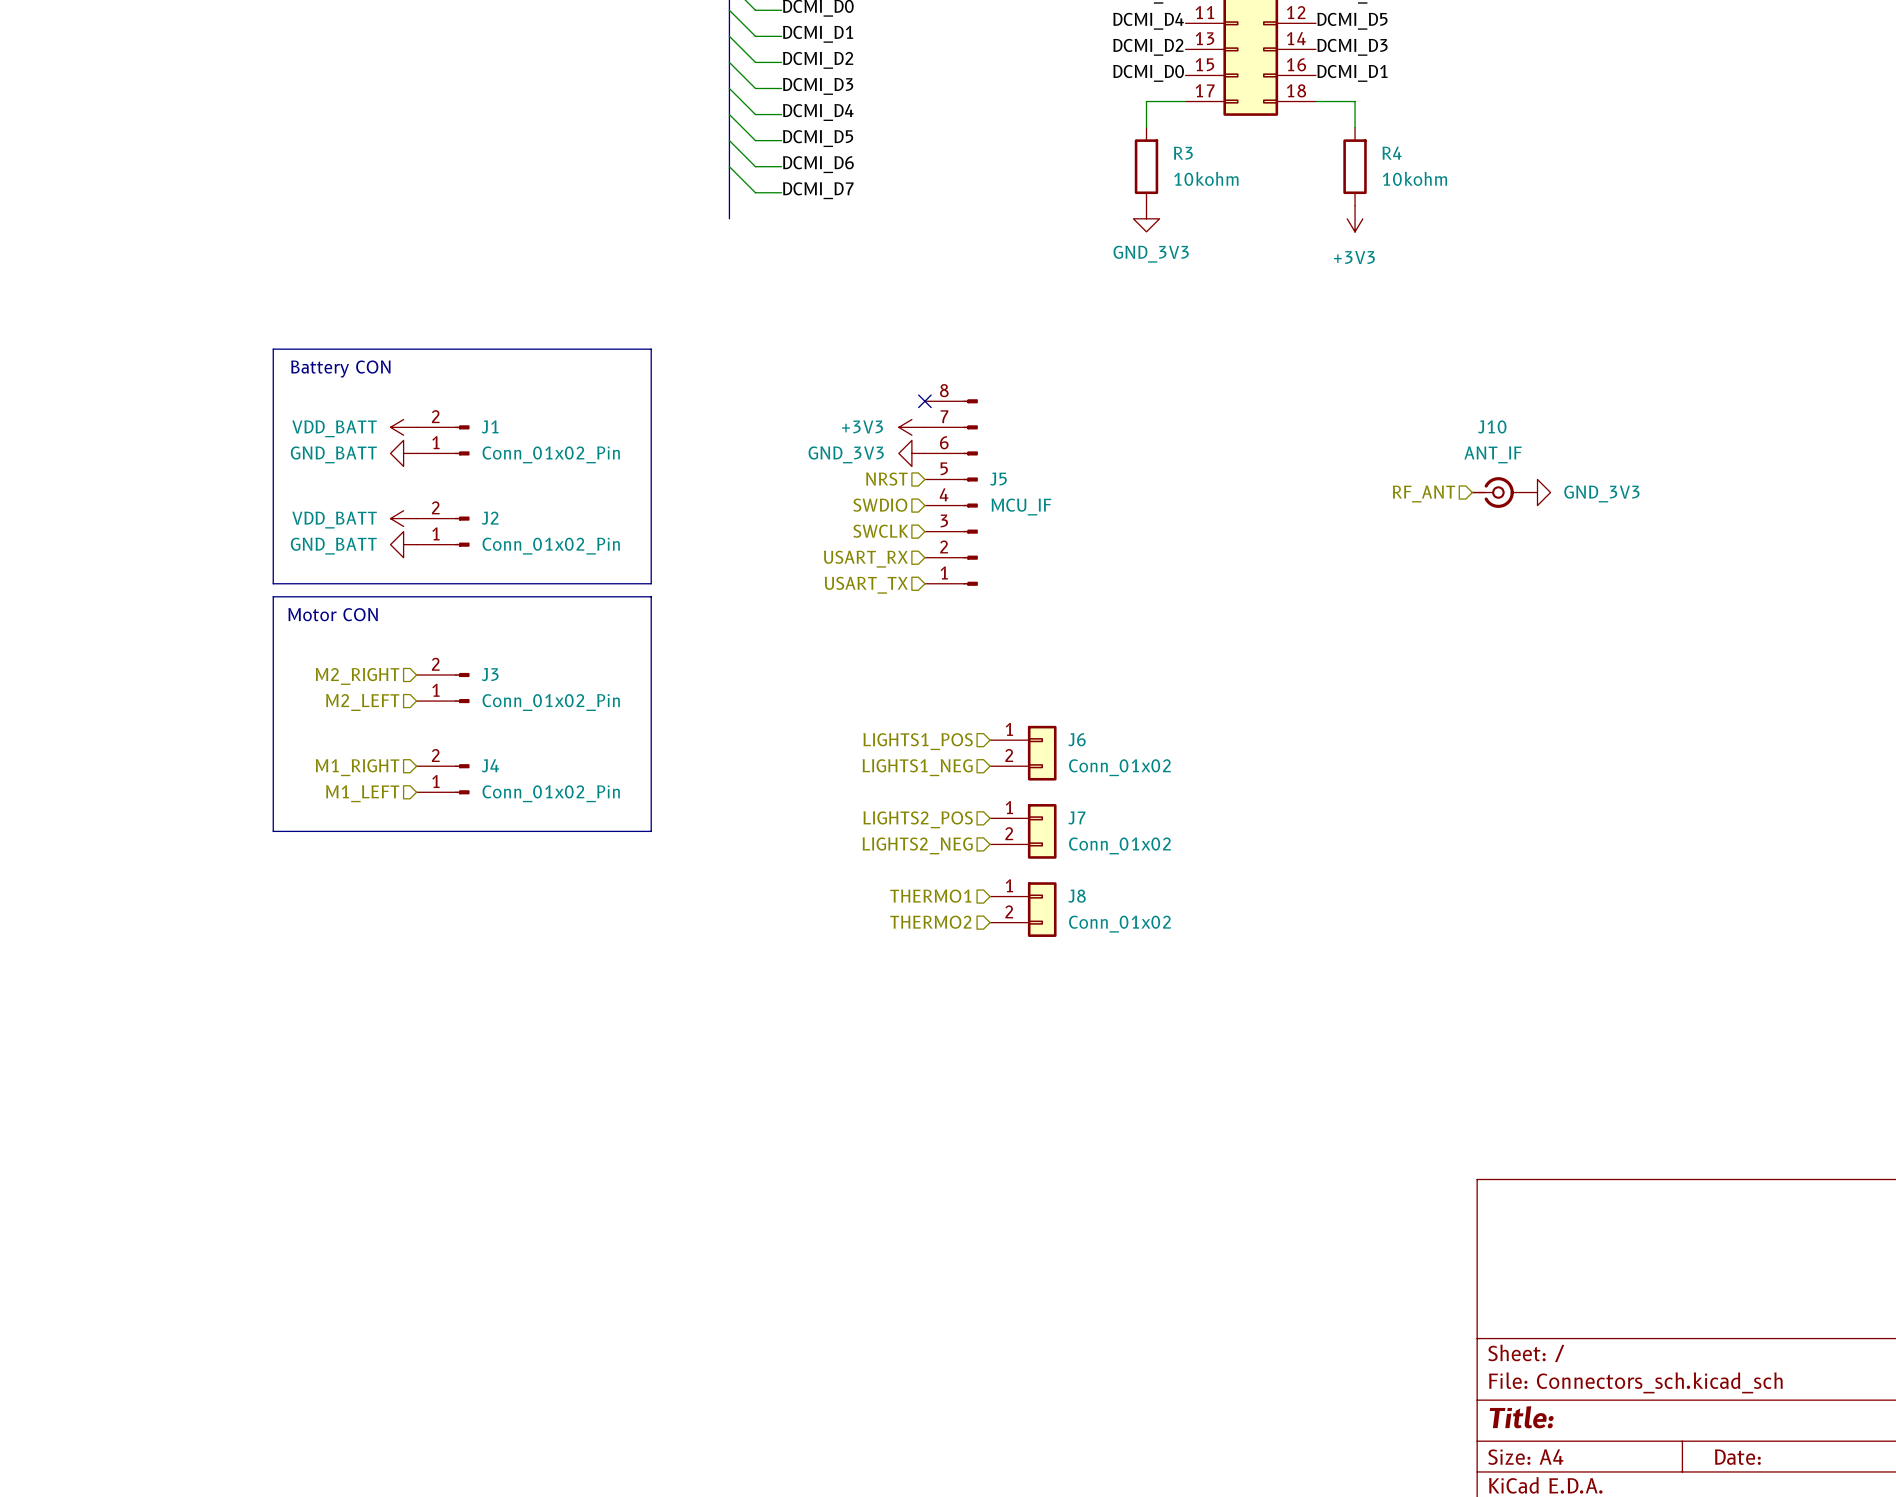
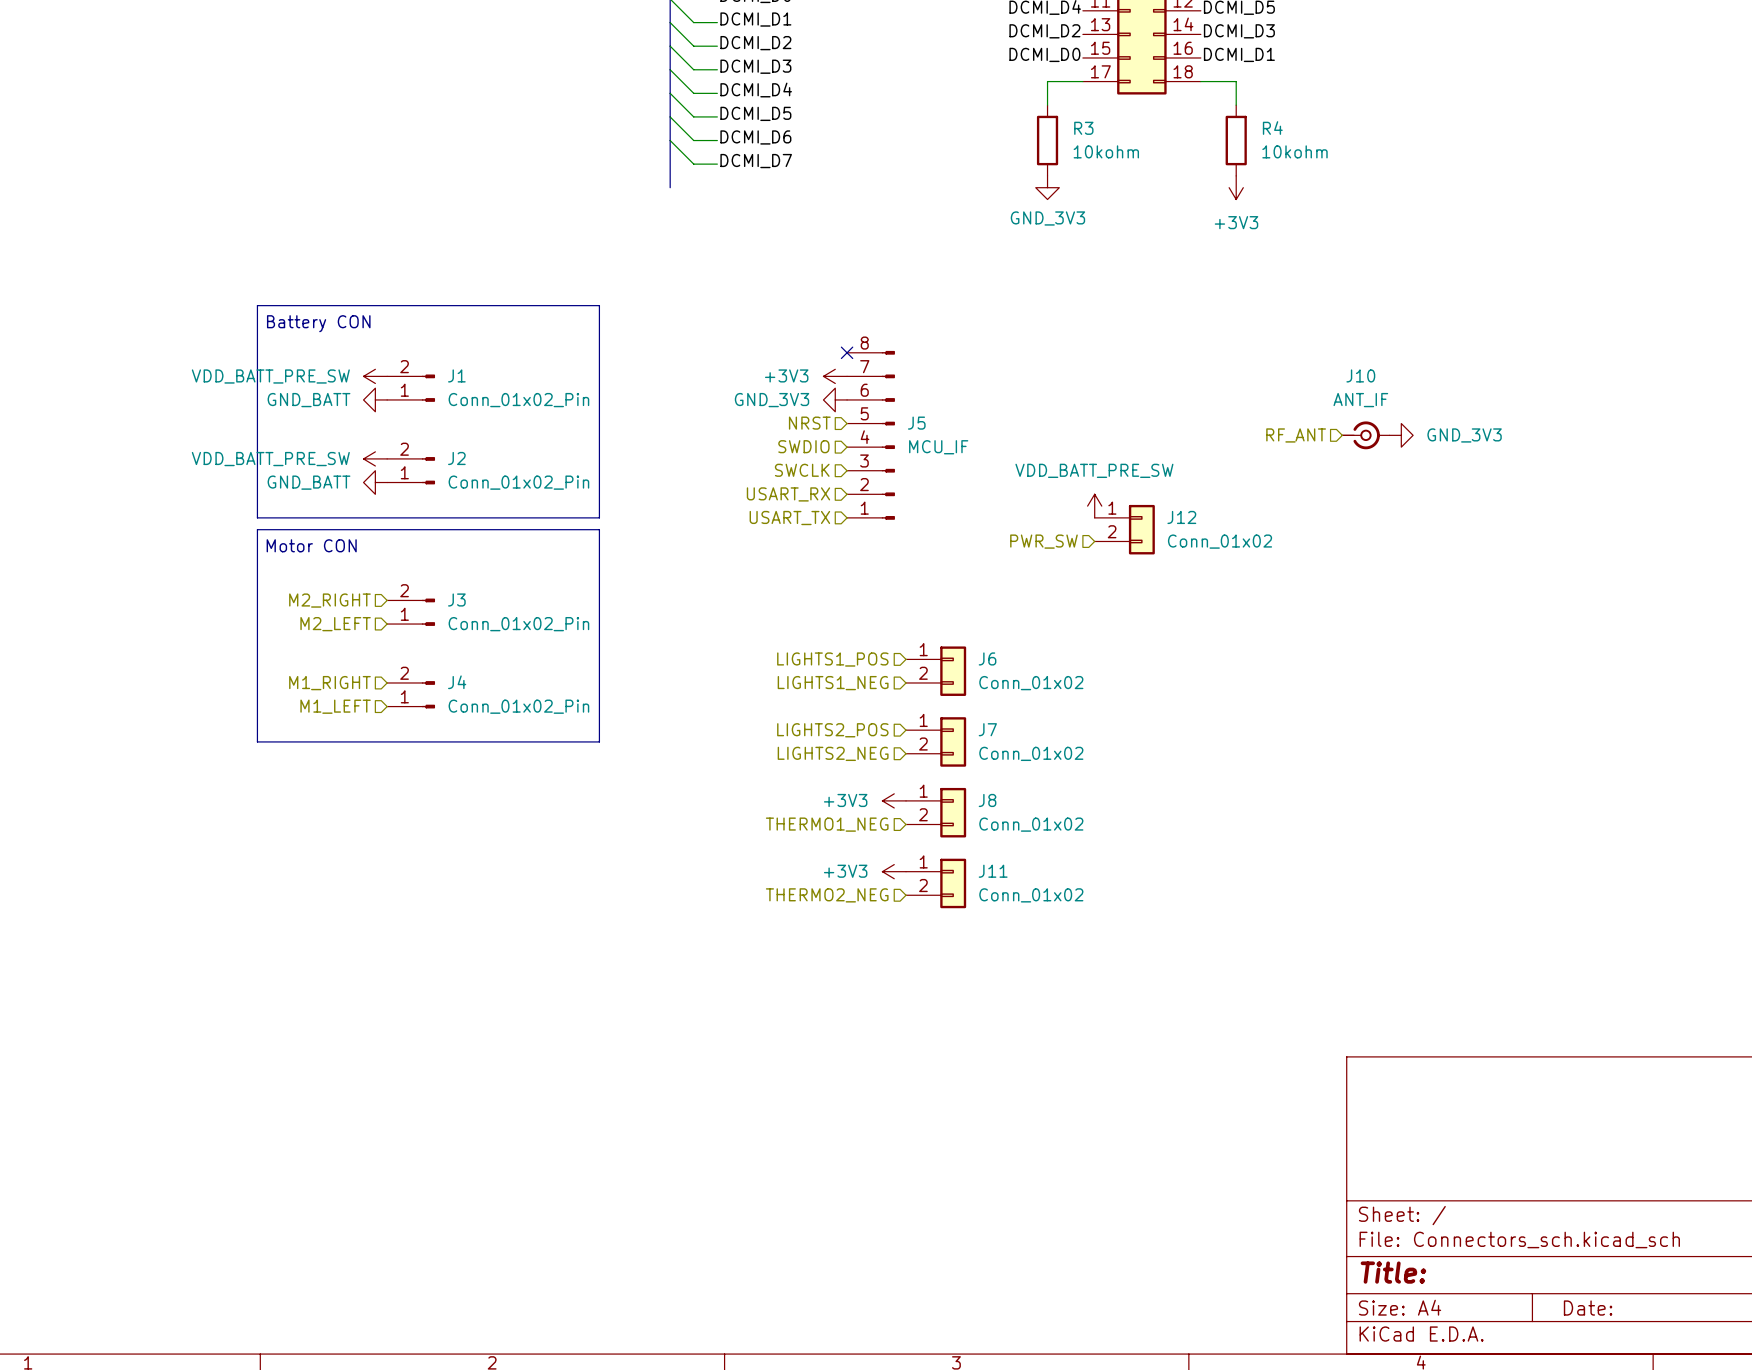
power symbol: VDD_BATT (403, 427) -> VDD_BATT_PRE_SW (375, 376)
power symbol: VDD_BATT (403, 518) -> VDD_BATT_PRE_SW (375, 458)
power symbol: none -> VDD_BATT_PRE_SW (1094, 506)
J12: none -> Conn_01x02 (1124, 529)
hierarchical label: none -> PWR_SW (1043, 541)
hierarchical label: THERMO1 (930, 896) -> none
power symbol: none -> +3V3 (894, 800)
hierarchical label: THERMO2 (930, 922) -> THERMO1_NEG (827, 824)
power symbol: none -> +3V3 (894, 871)
J11: none -> Conn_01x02 (936, 883)
hierarchical label: none -> THERMO2_NEG (827, 895)

